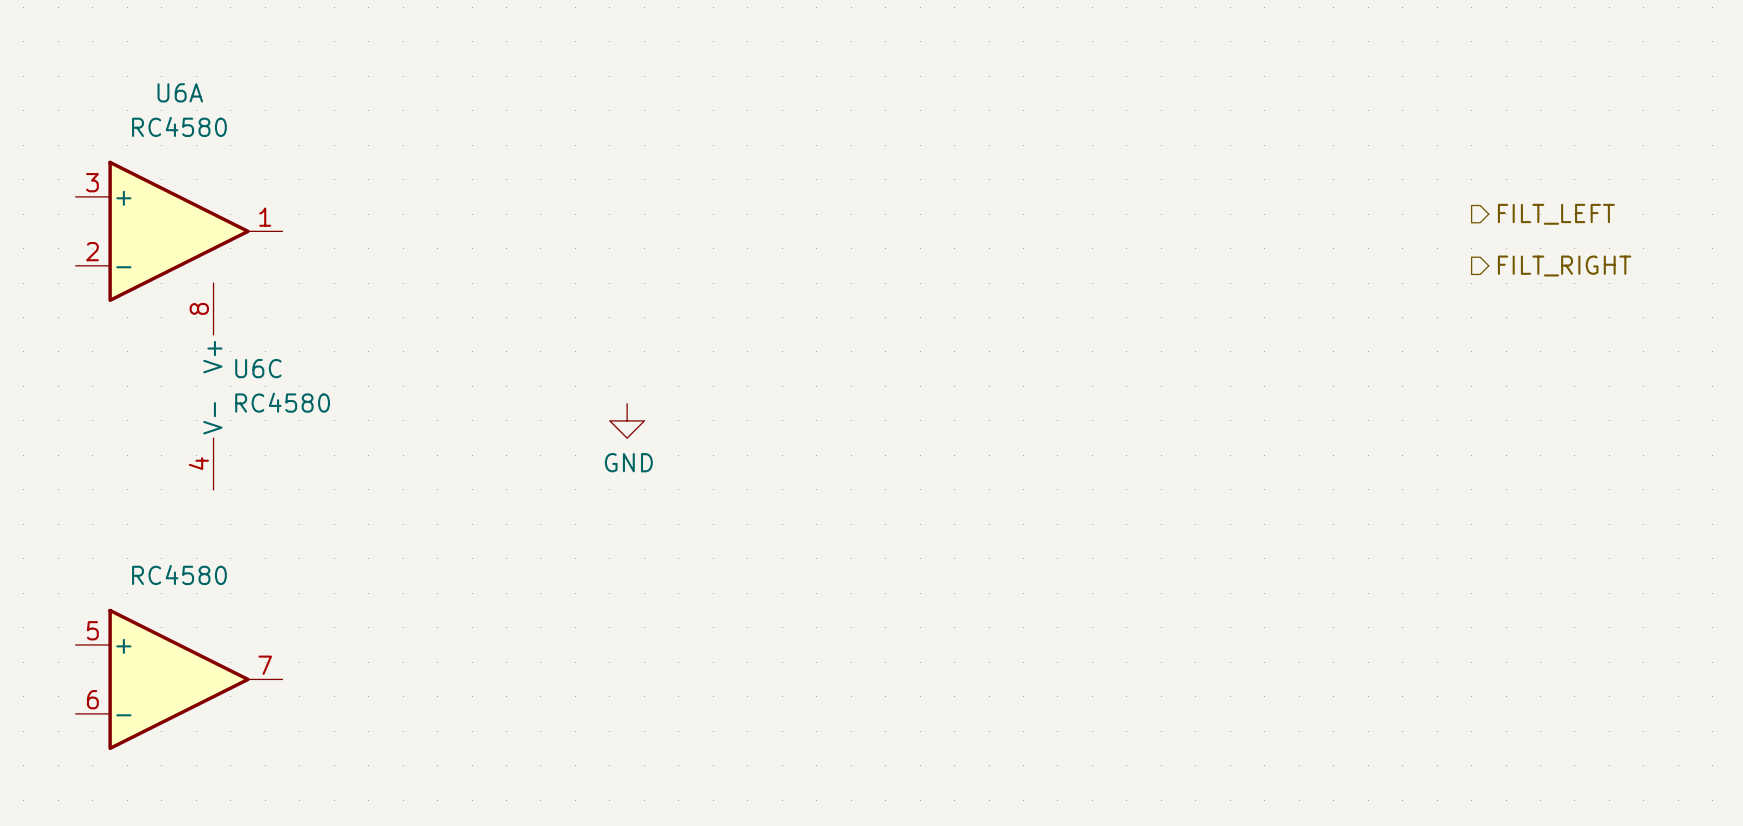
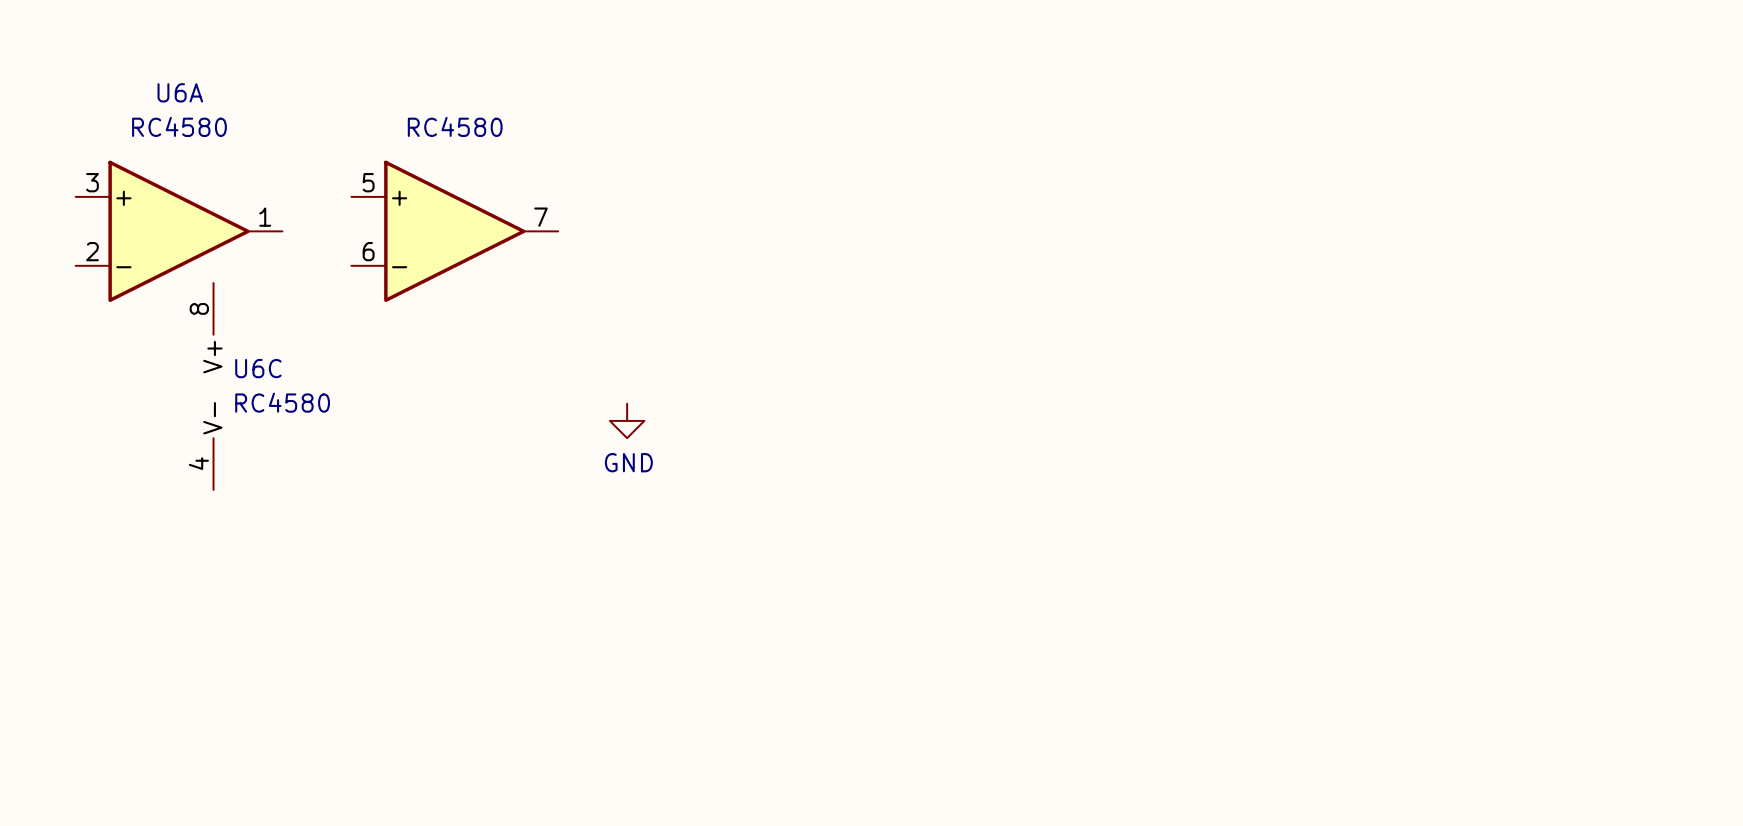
hierarchical label: FILT_LEFT (1556, 214) -> none
part: none -> RC4580 (454, 231)
hierarchical label: FILT_RIGHT (1564, 266) -> none
part: RC4580 (179, 679) -> none

